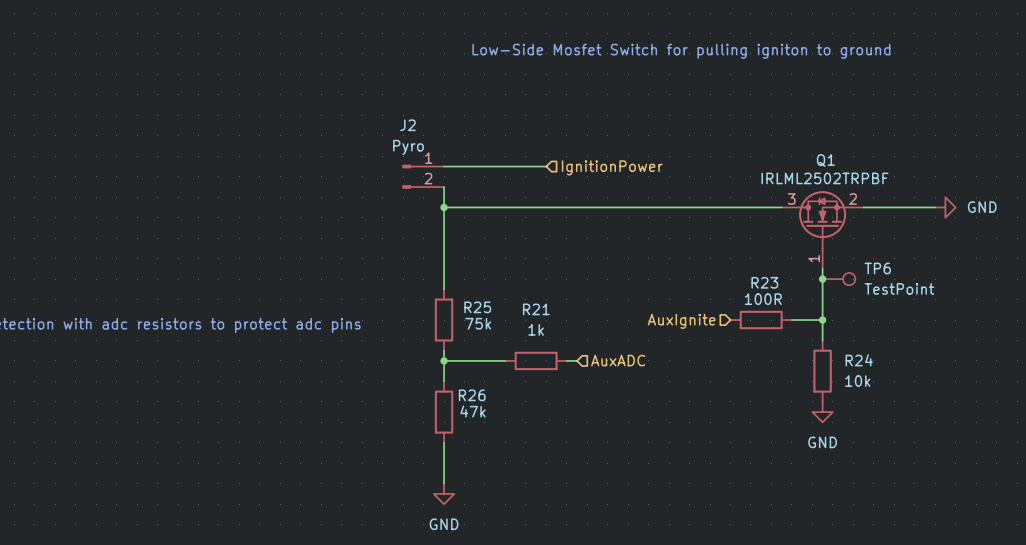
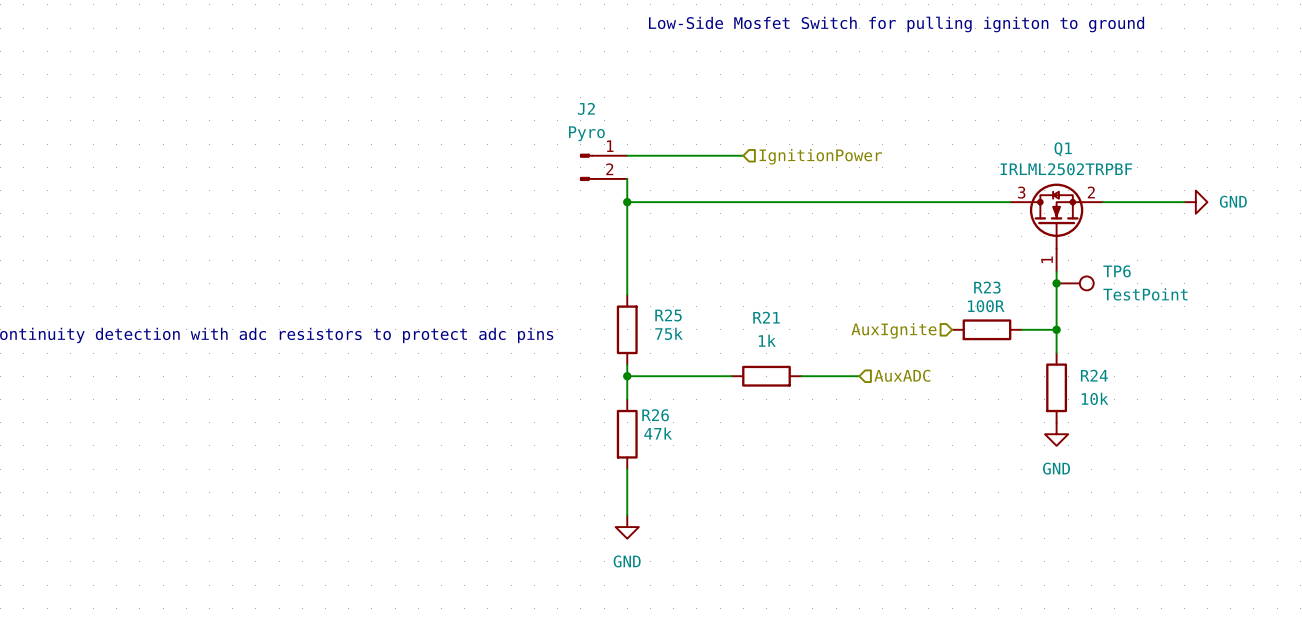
wire: none -> (696, 376) (731, 376)
R21 position: (536, 360) -> (766, 376)
wire: (566, 360) (577, 360) -> none
wire: none -> (801, 376) (859, 376)
hierarchical label position: AuxADC (618, 360) -> AuxADC (902, 375)

